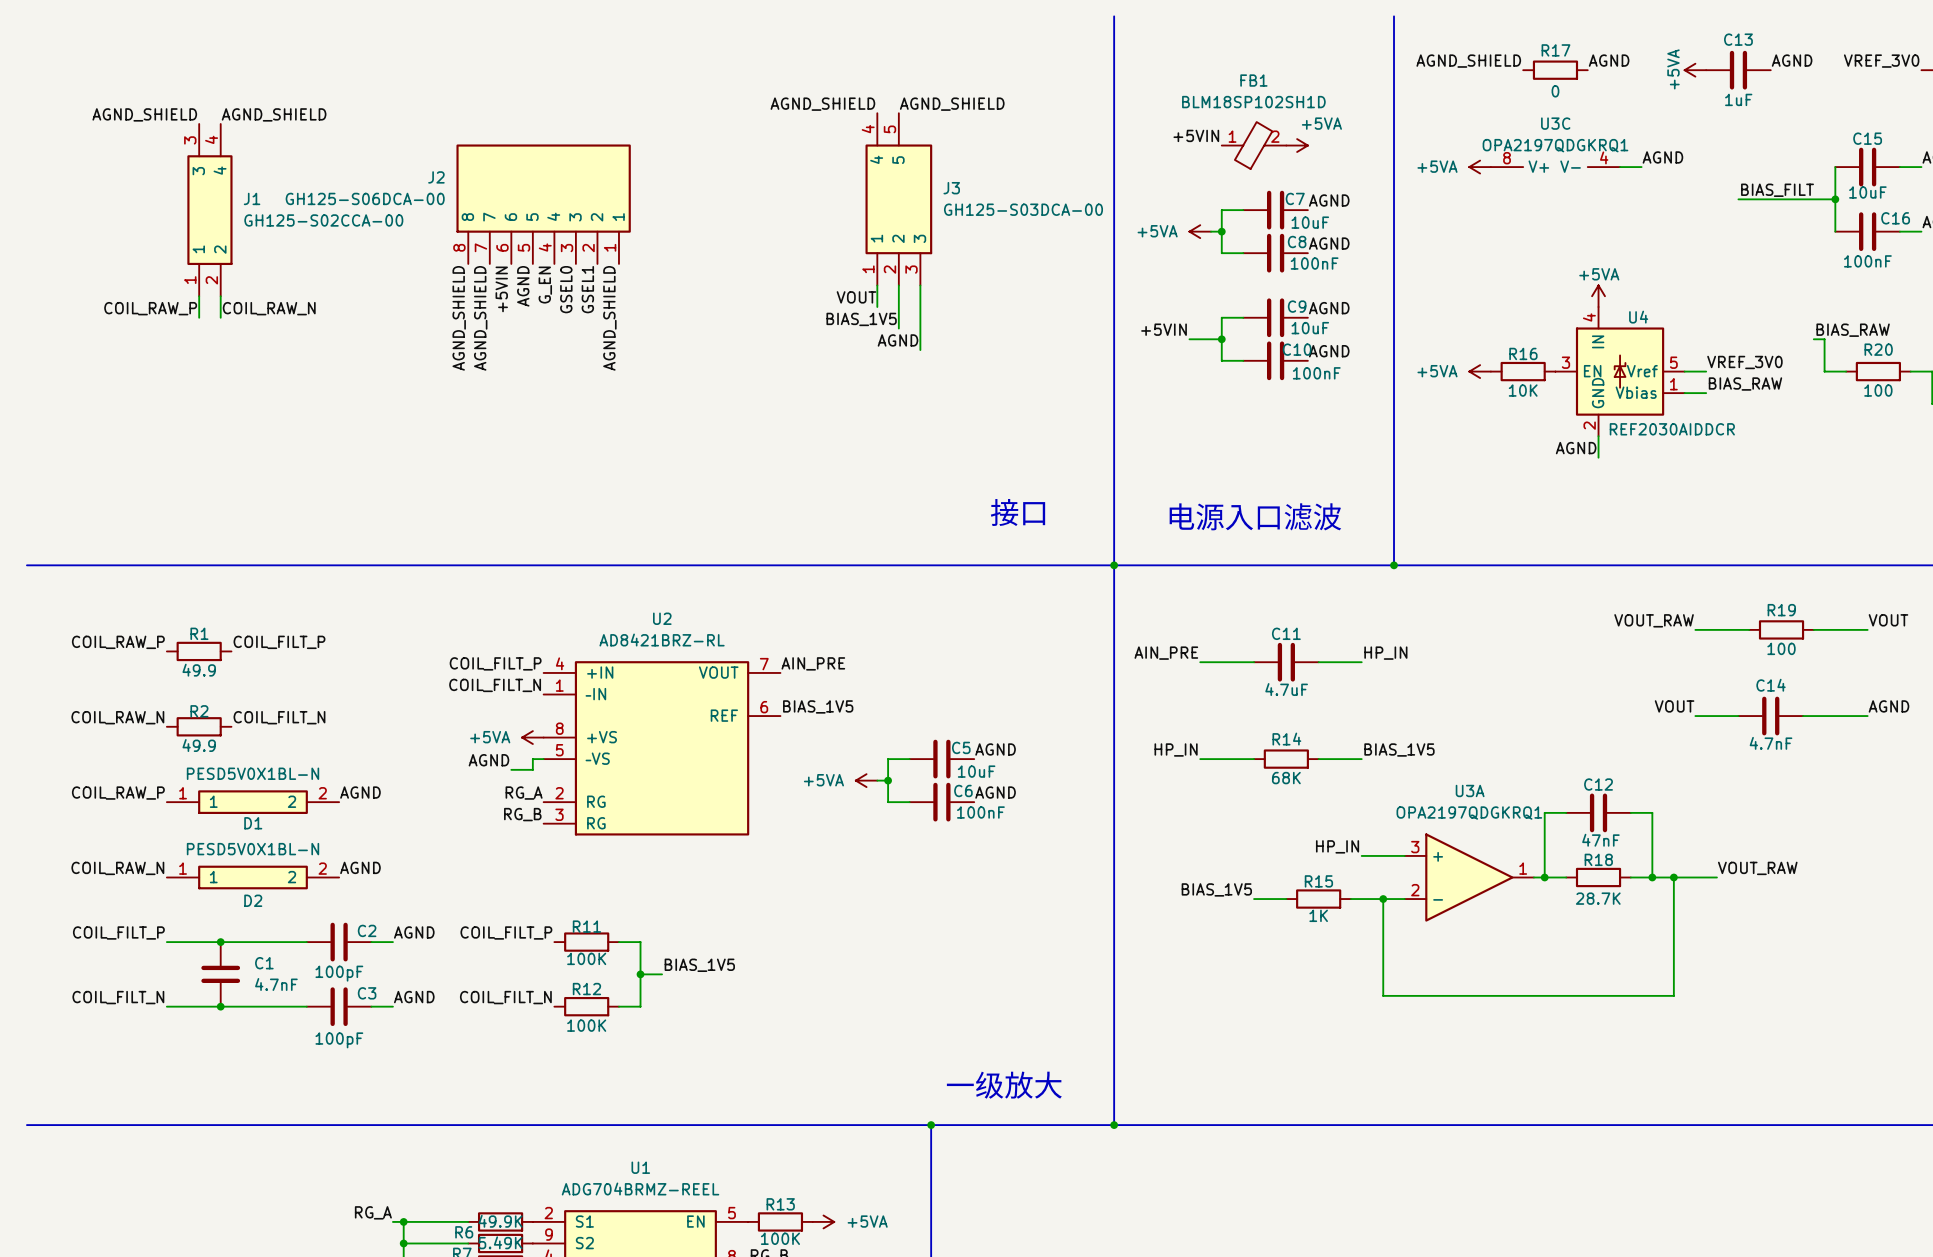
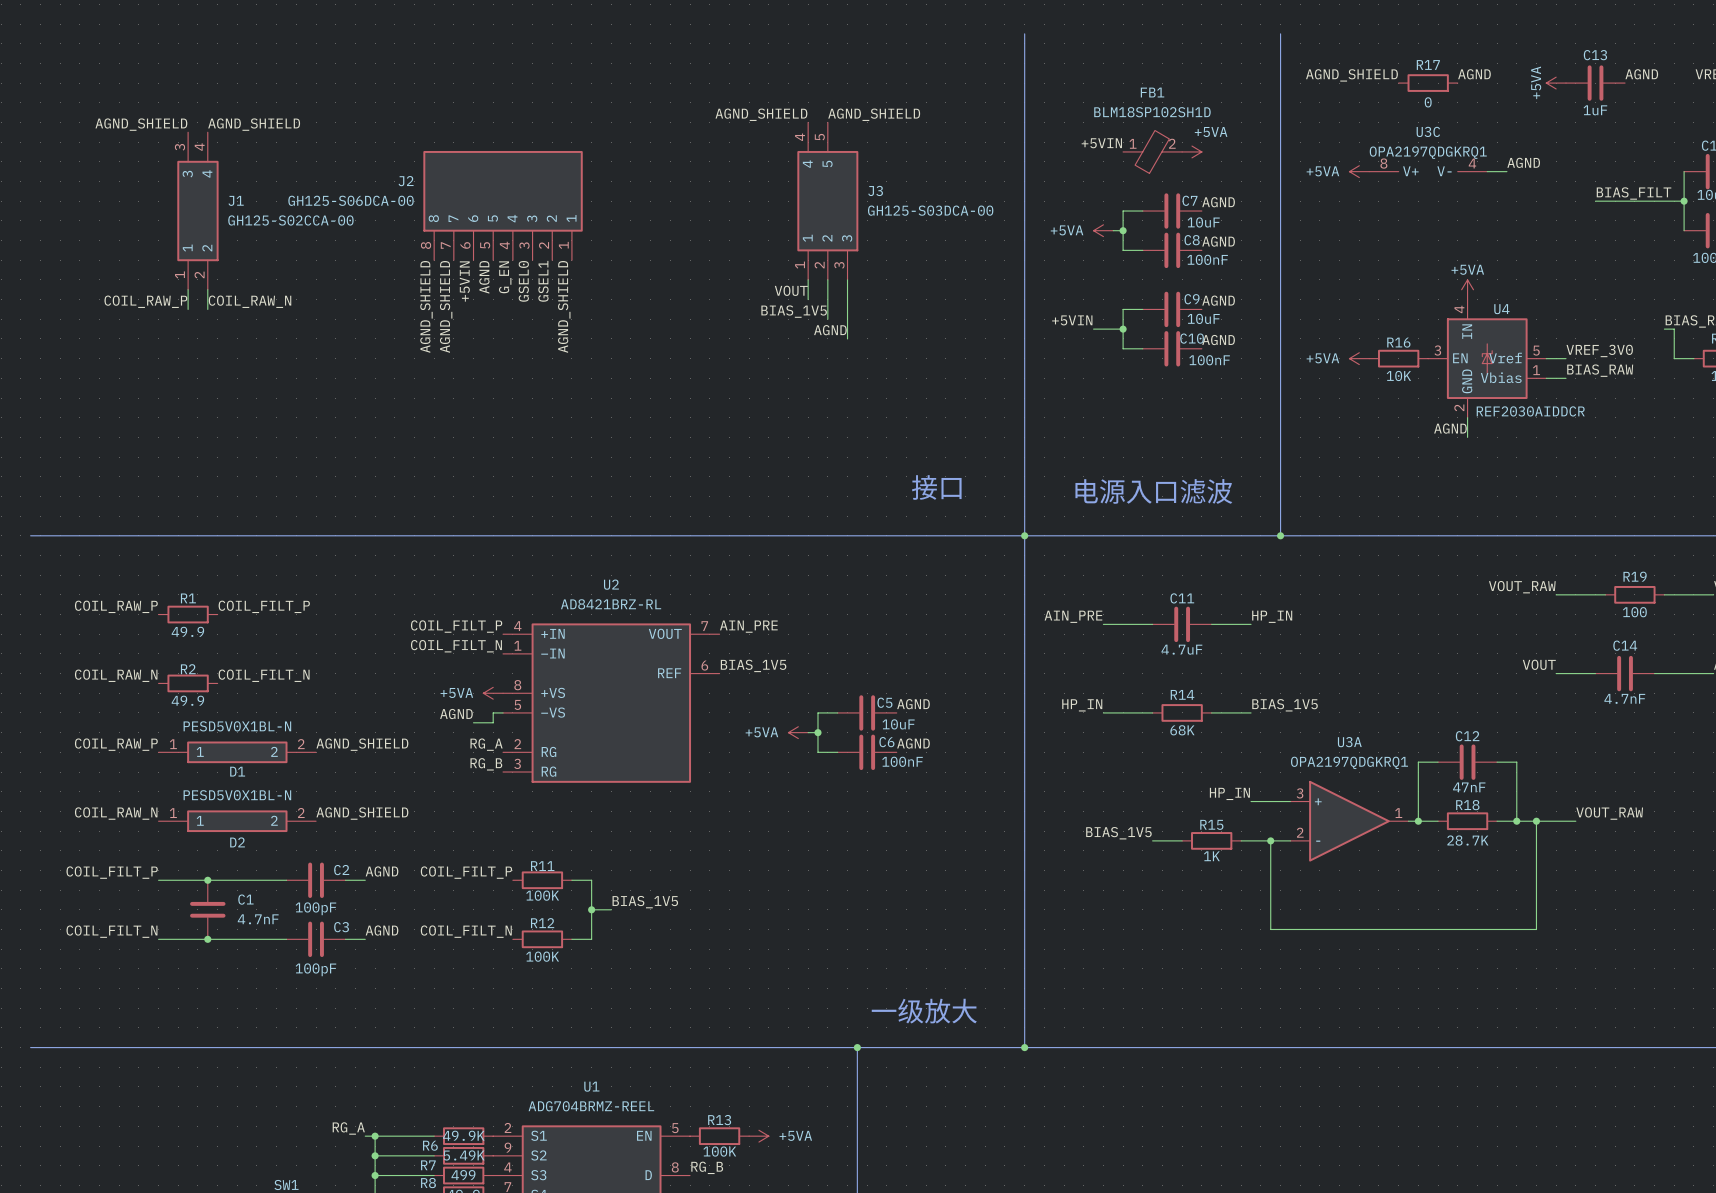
label: AGND (360, 792) -> AGND_SHIELD (362, 744)
label: AGND (360, 867) -> AGND_SHIELD (362, 813)

